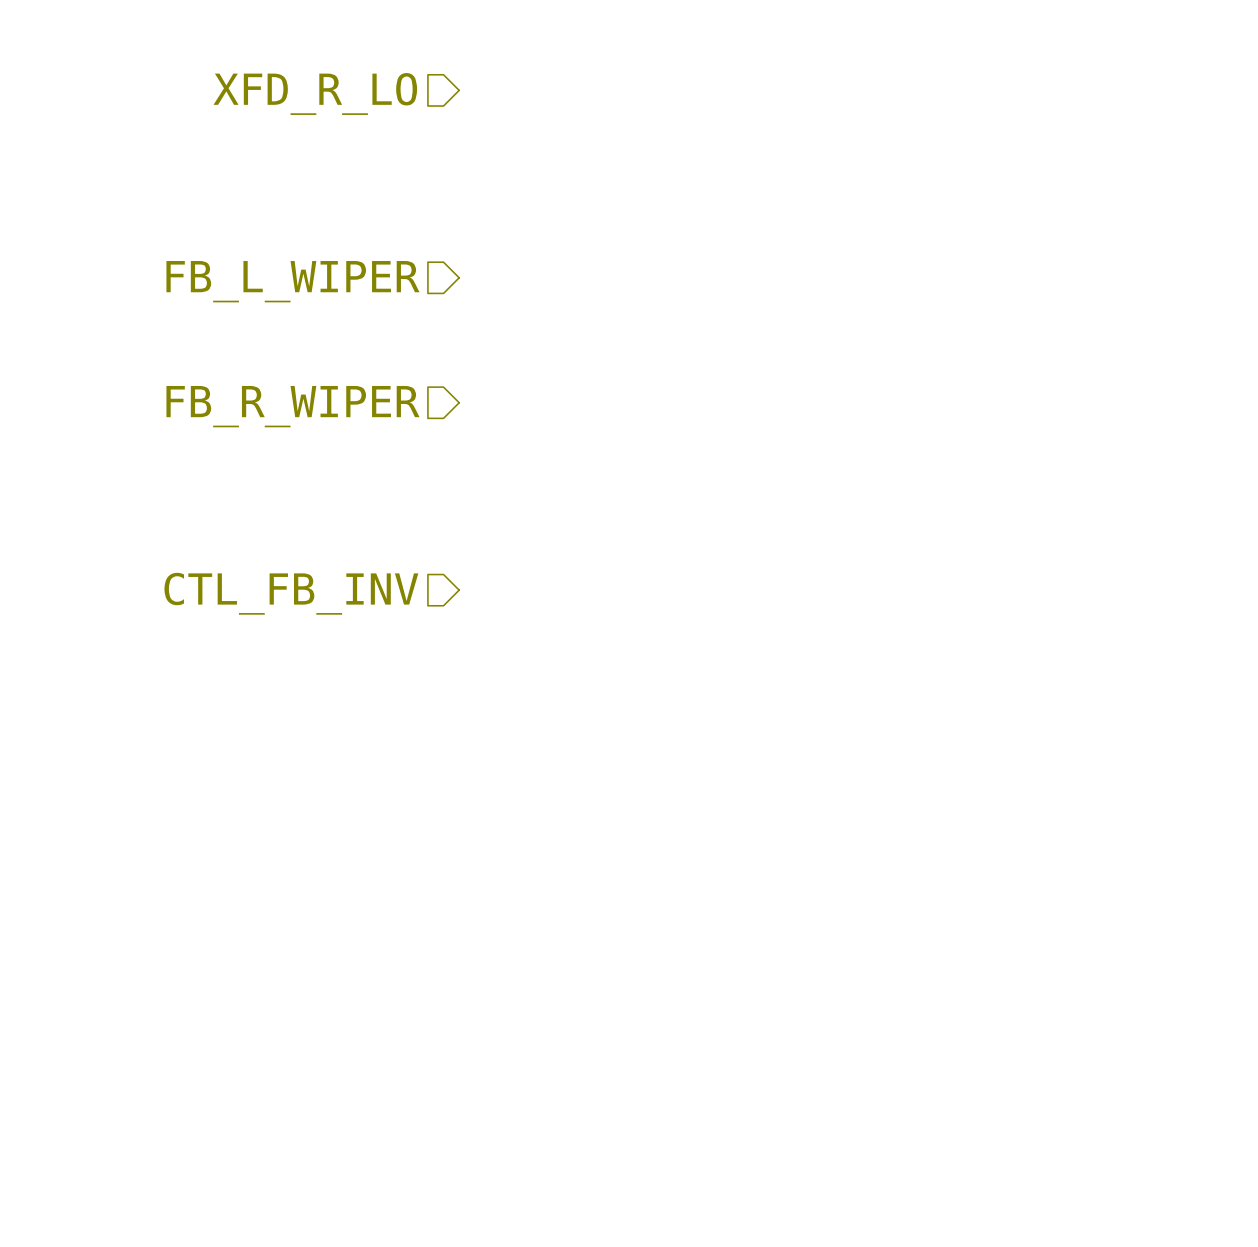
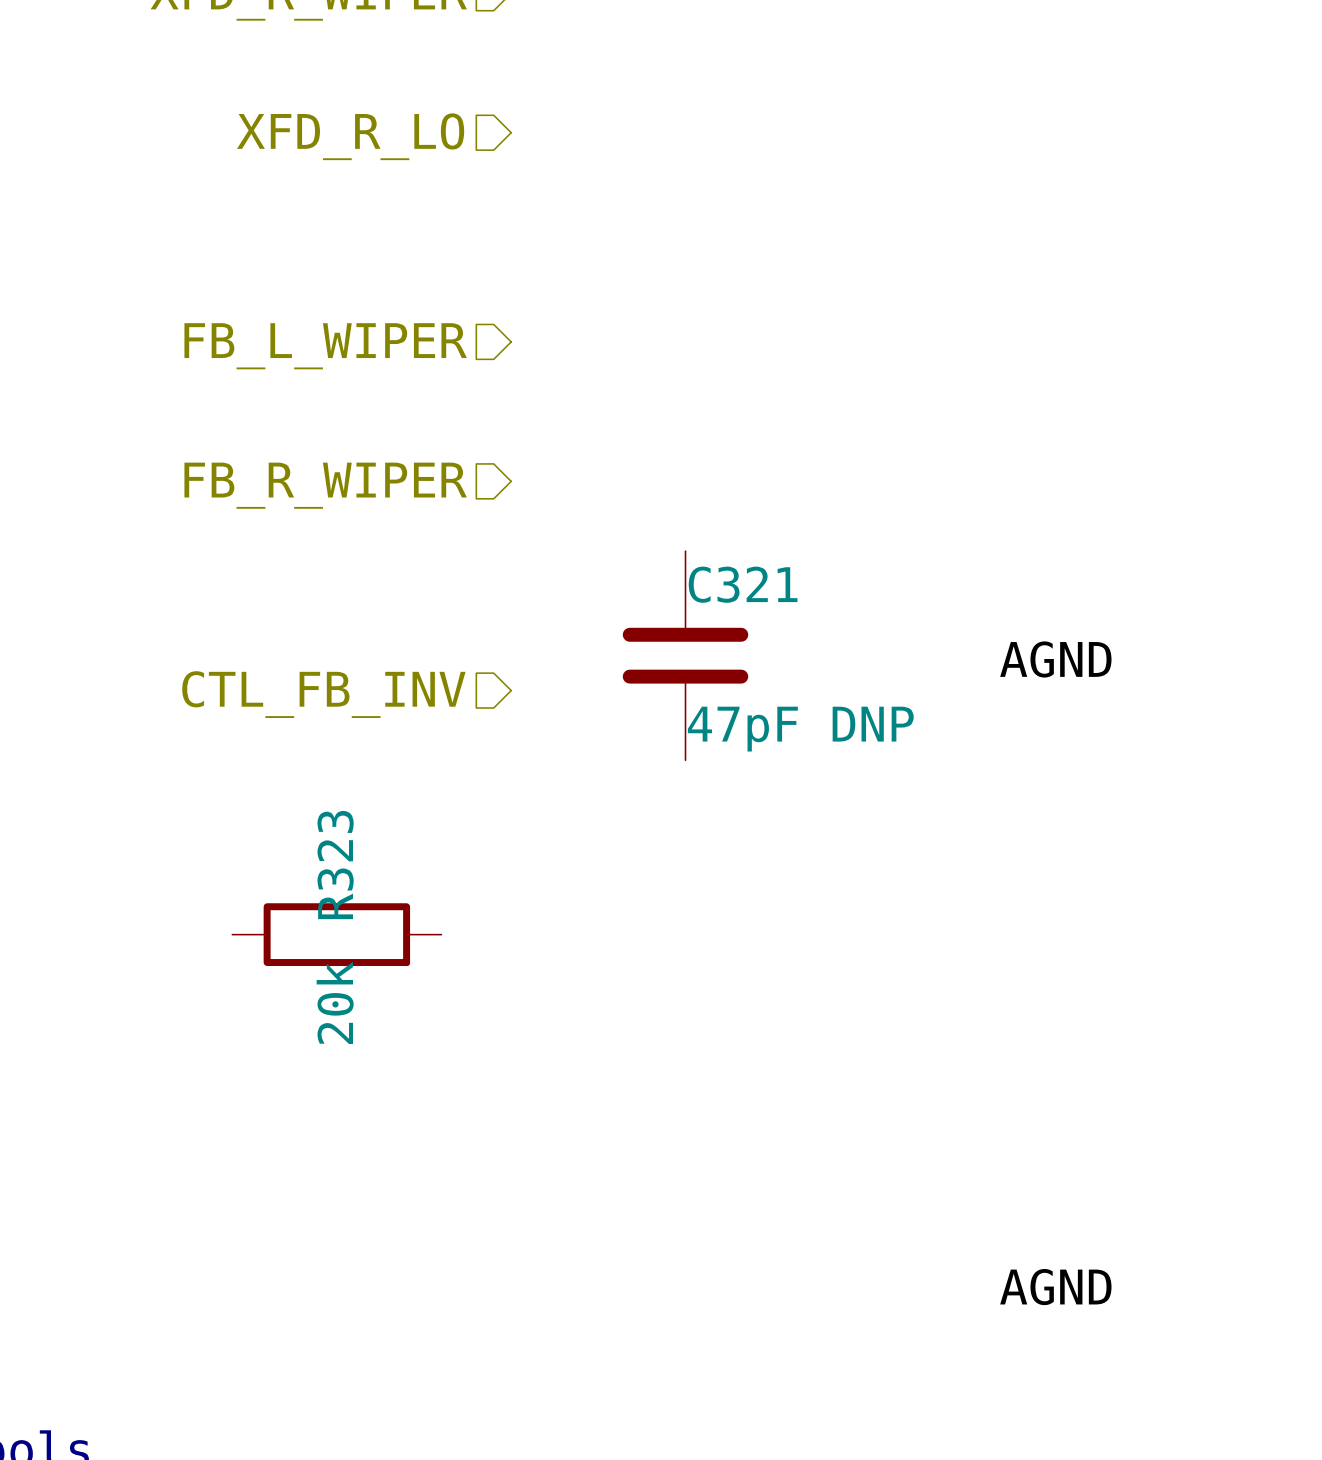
C321: none -> 47pF DNP (685, 655)
label: none -> AGND (1055, 659)
R323: none -> 20k (336, 934)
label: none -> AGND (1055, 1287)

